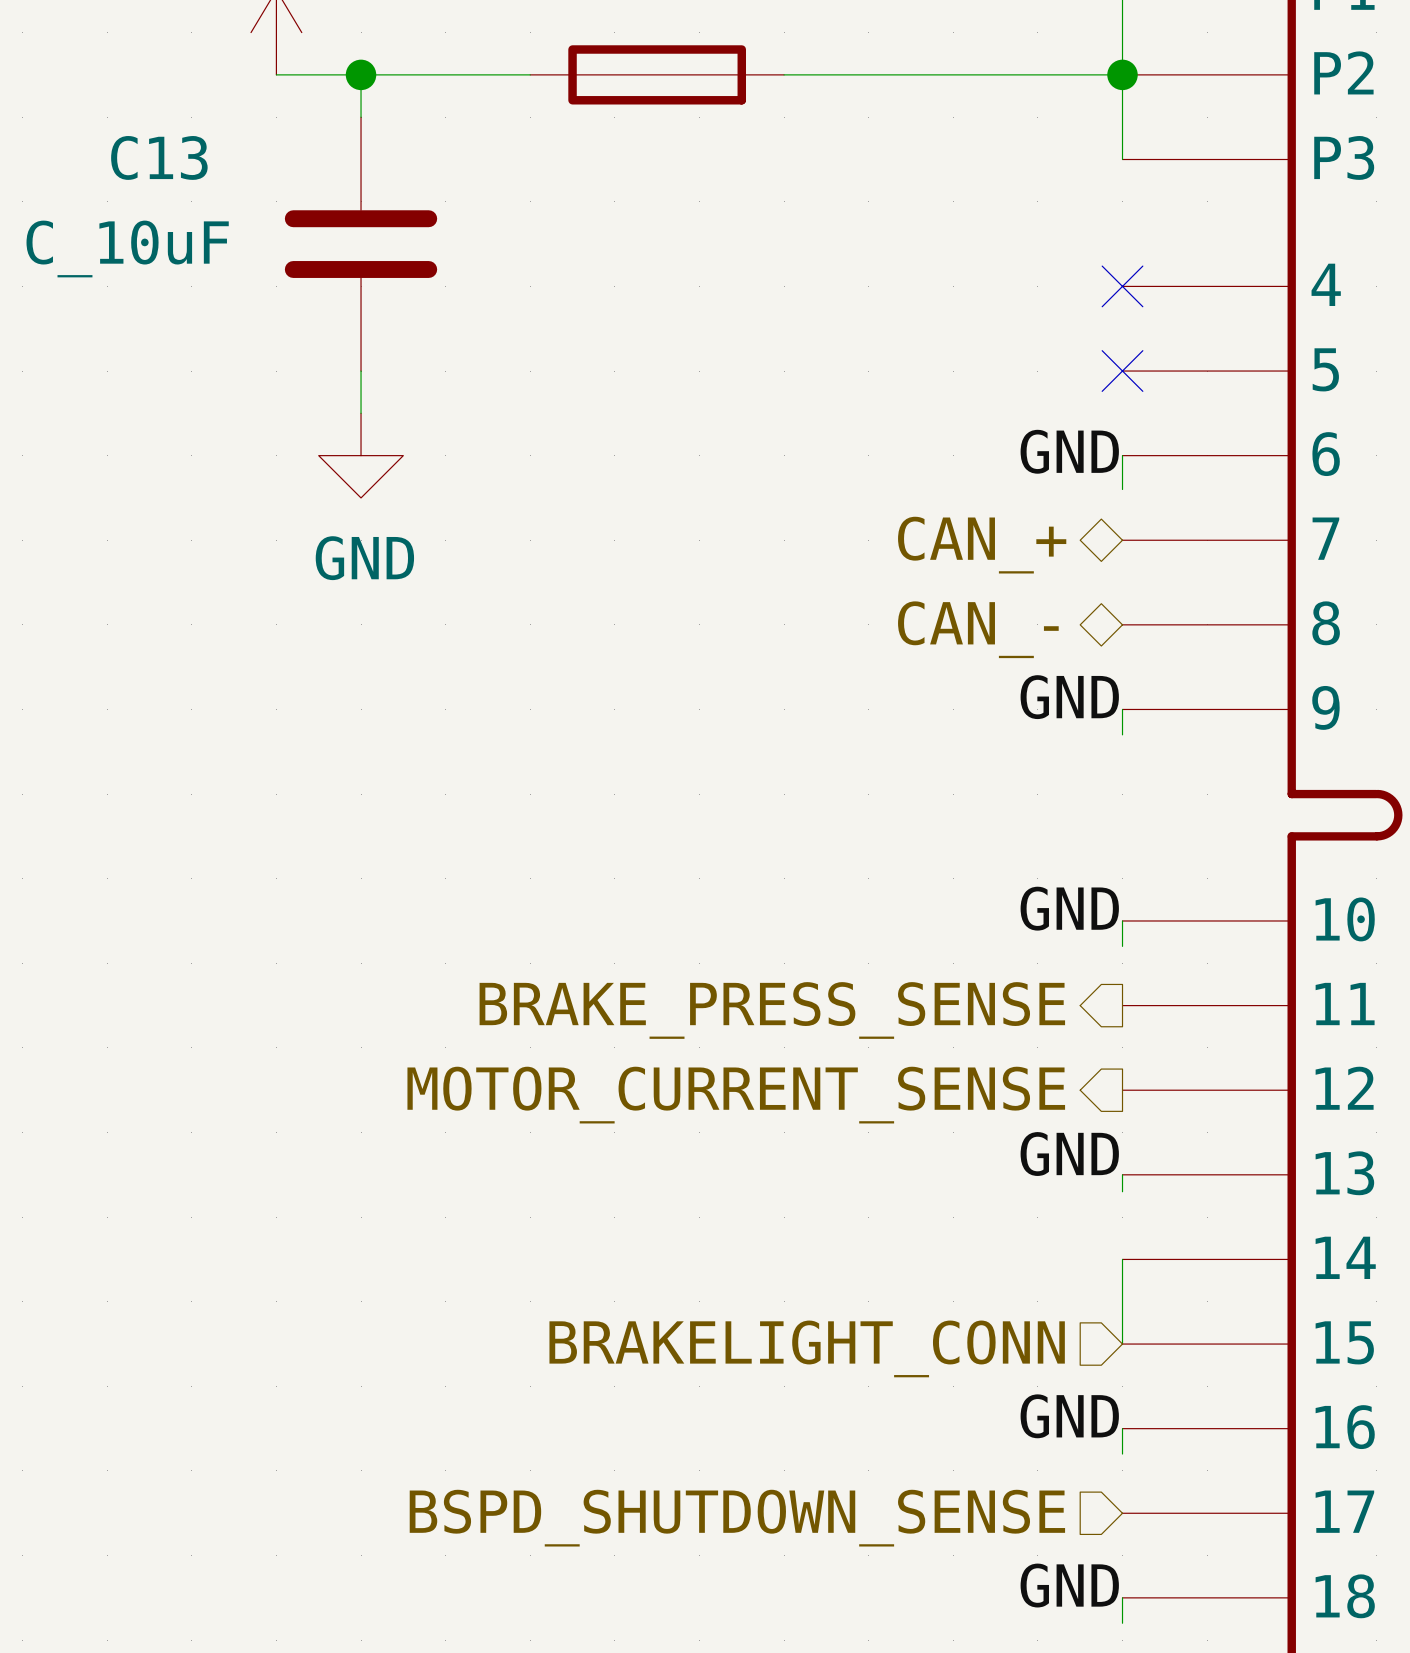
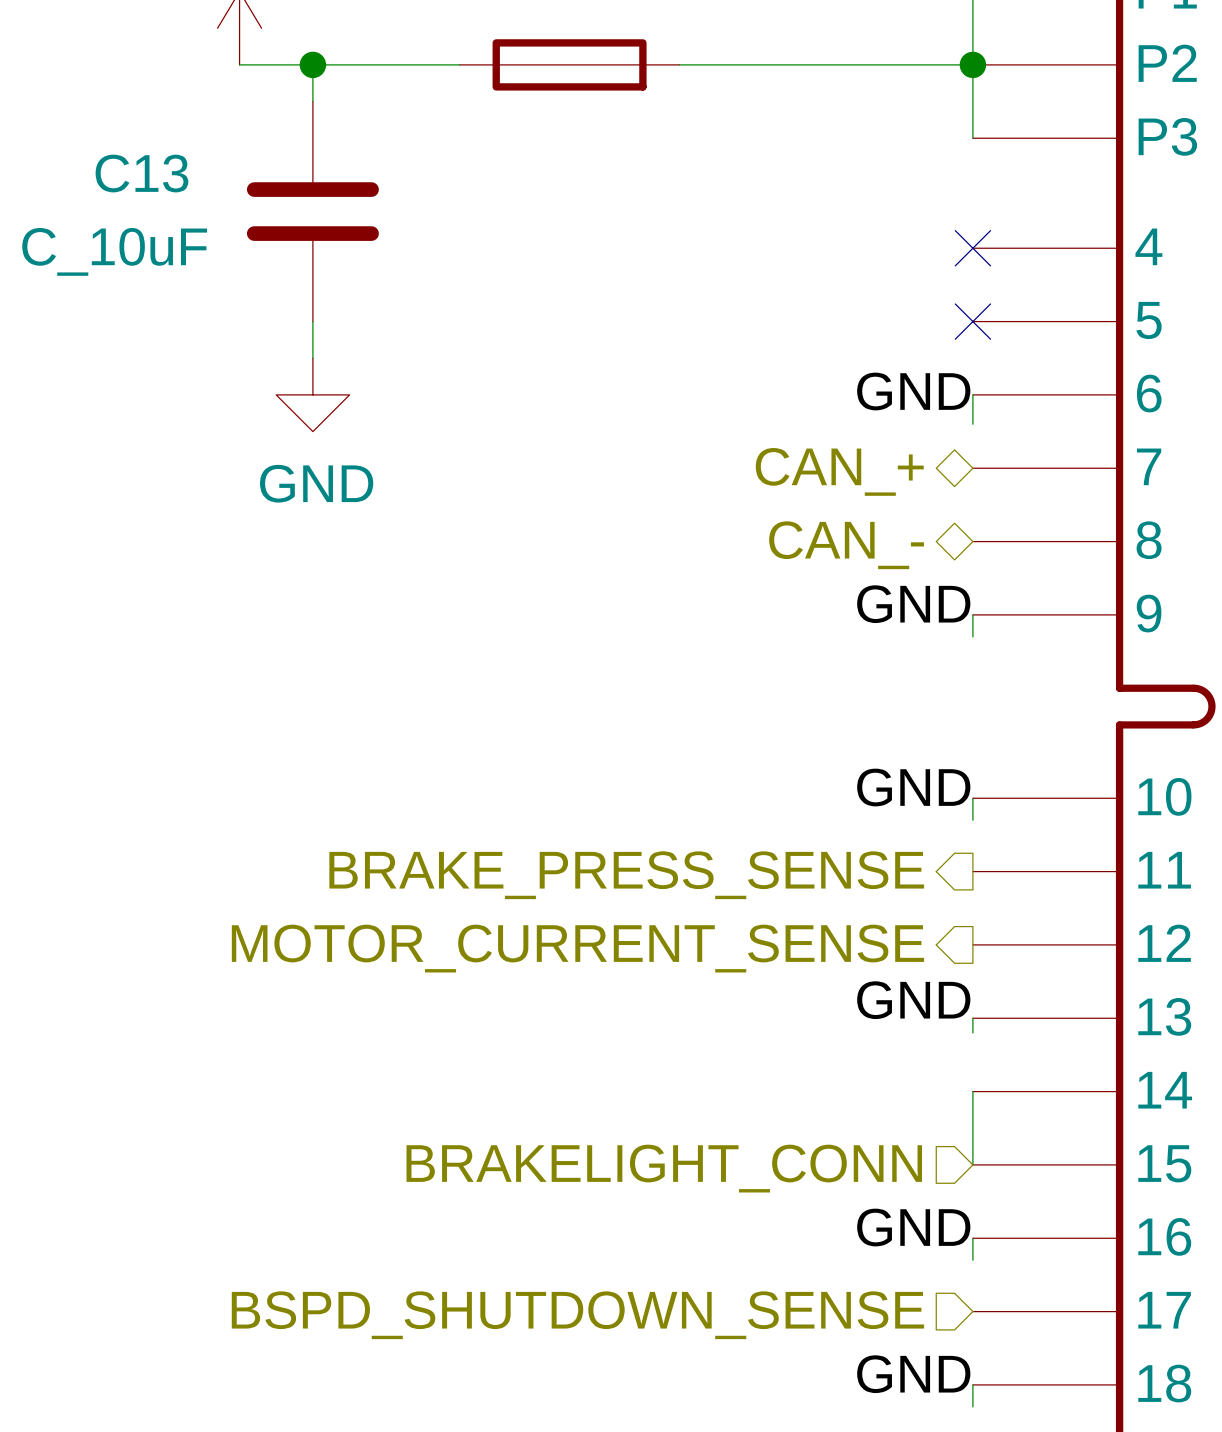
C13 name position: C13 (159, 157) -> C13 (141, 173)
C13 value position: C_10uF (127, 248) -> C_10uF (114, 251)

